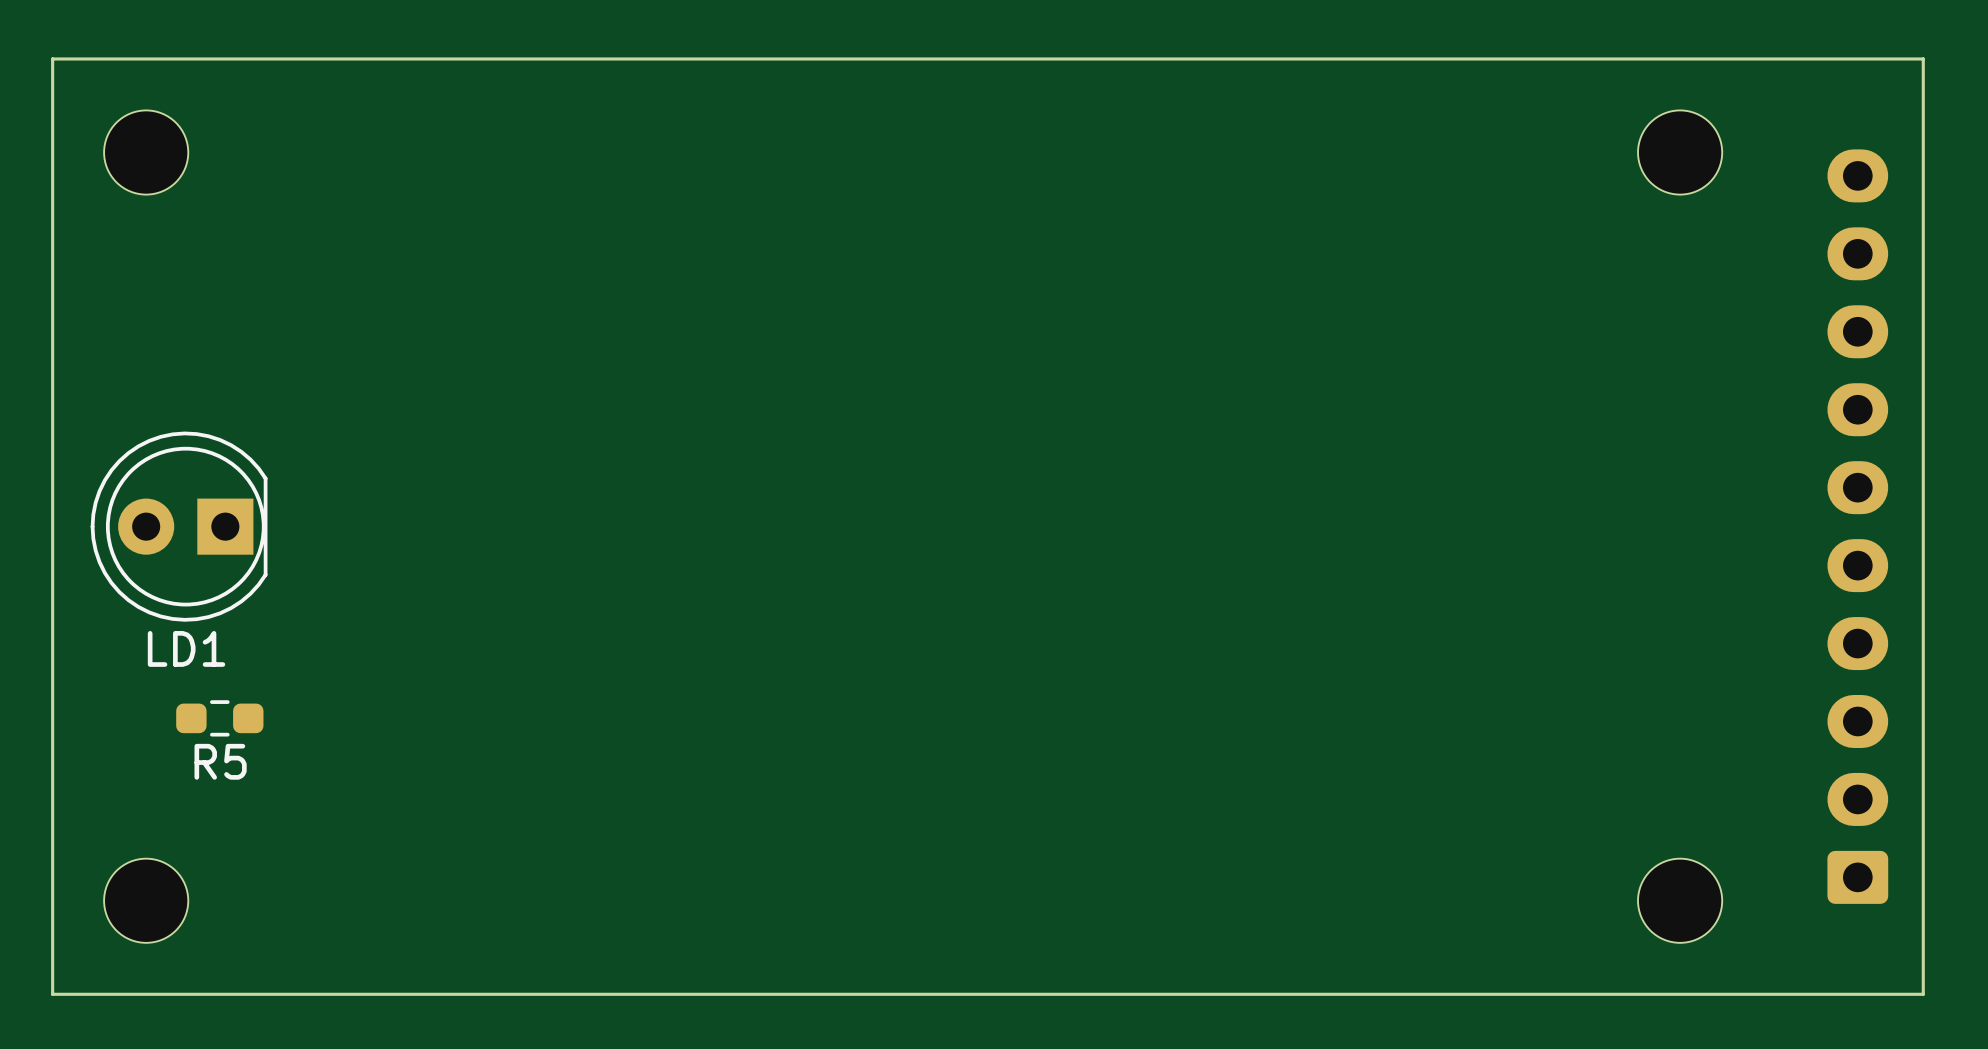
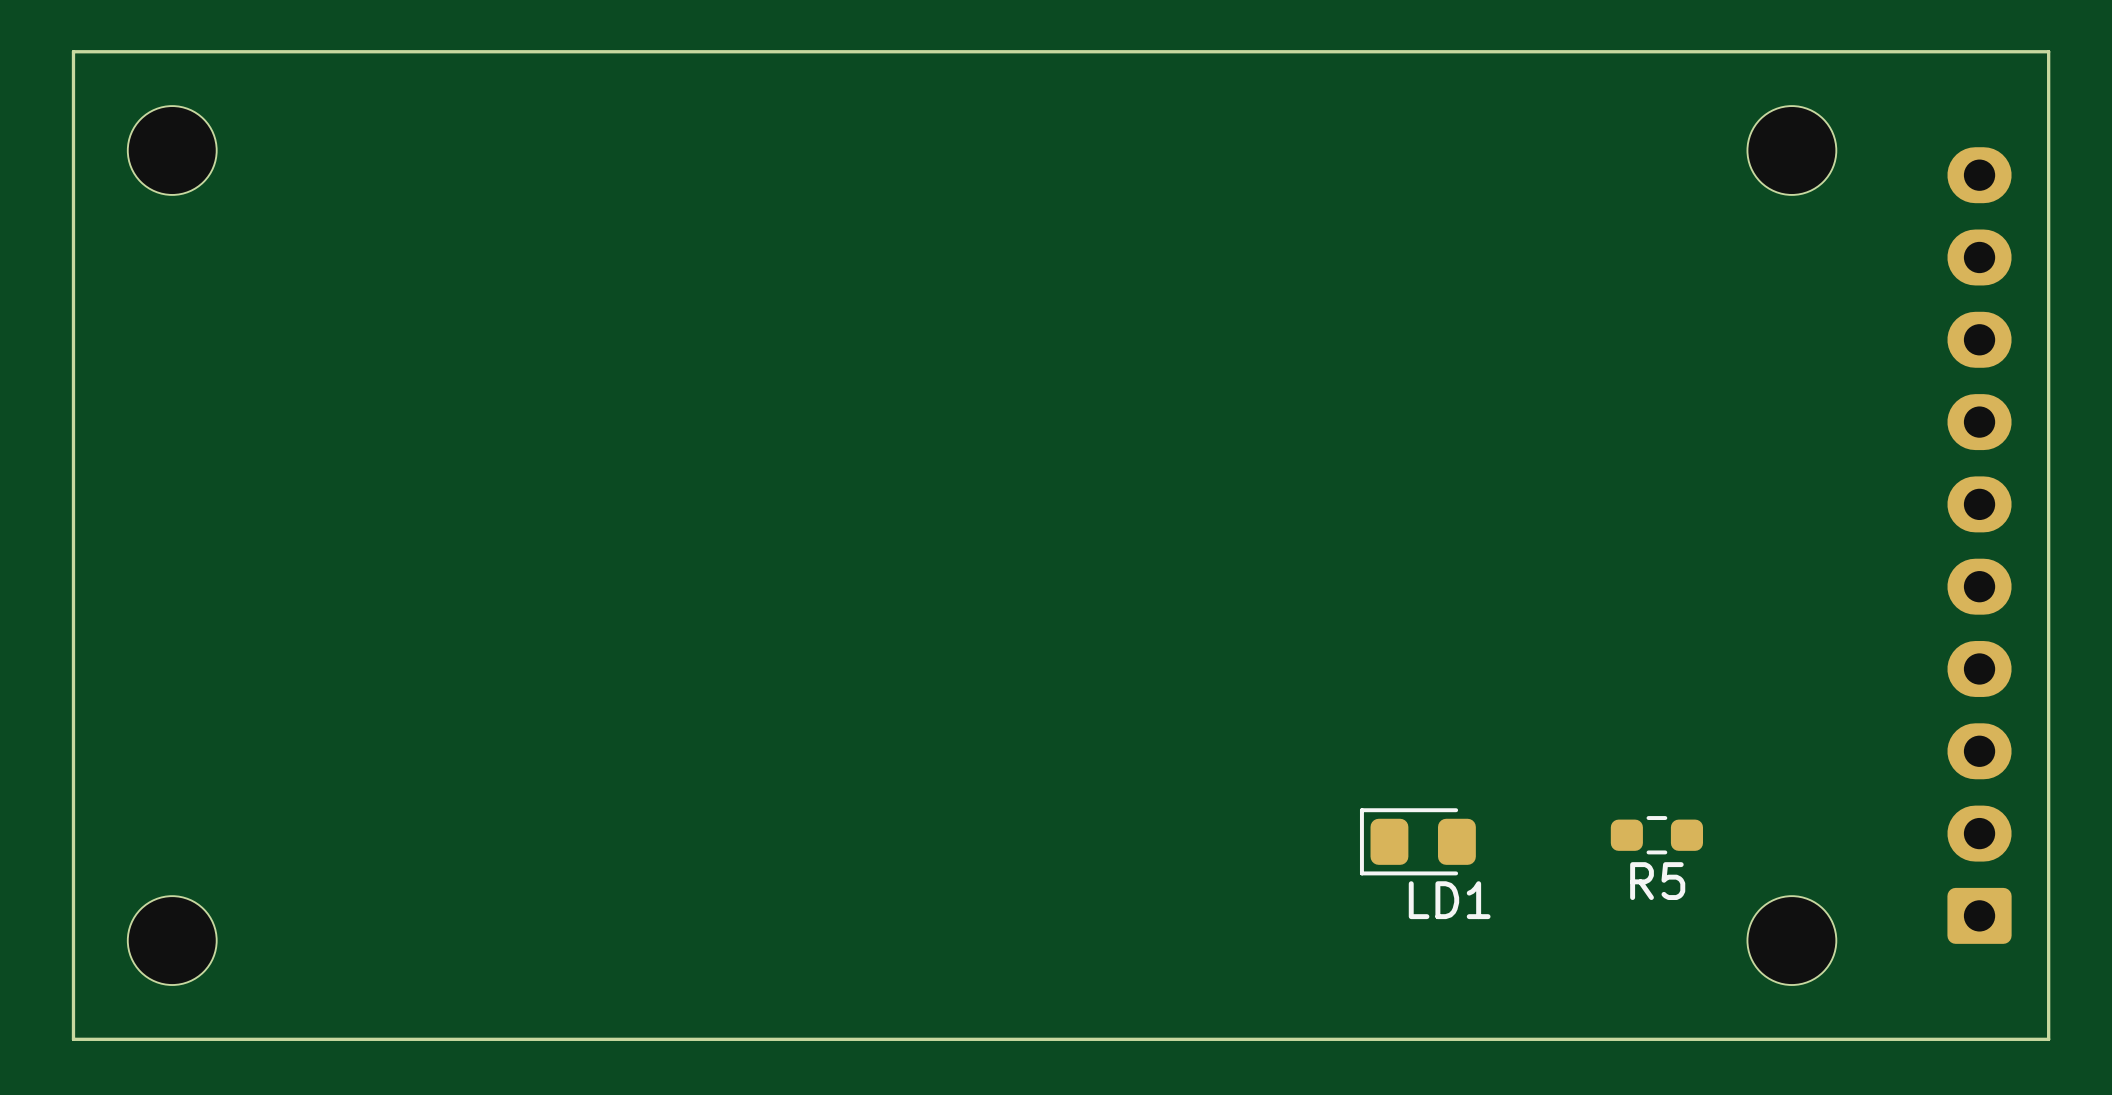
LD1 footprint: [90, 431, 268, 622] -> [1359, 808, 1476, 876]
LD1 name position: LD1 (186, 648) -> LD1 (1449, 900)
R5 position: (219, 718) -> (1656, 835)

